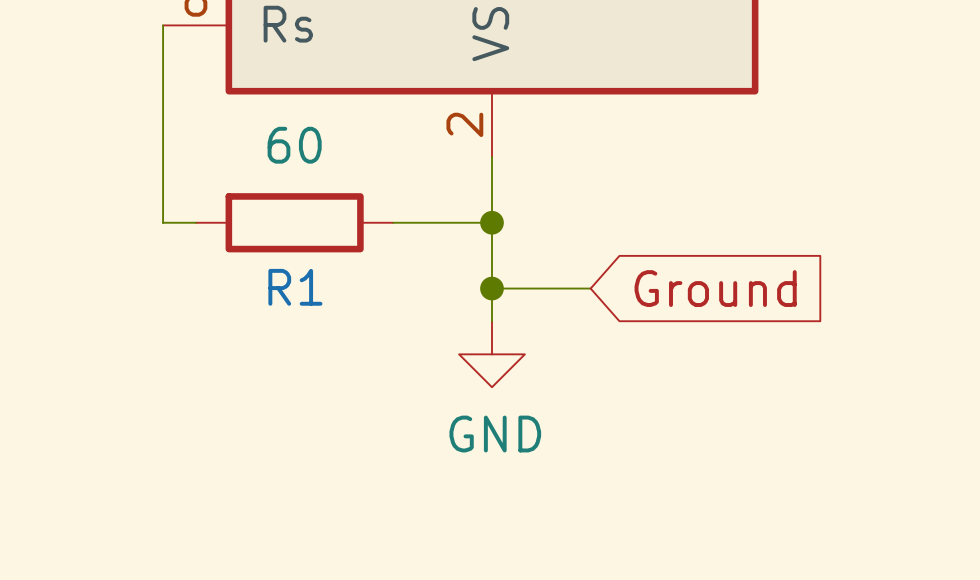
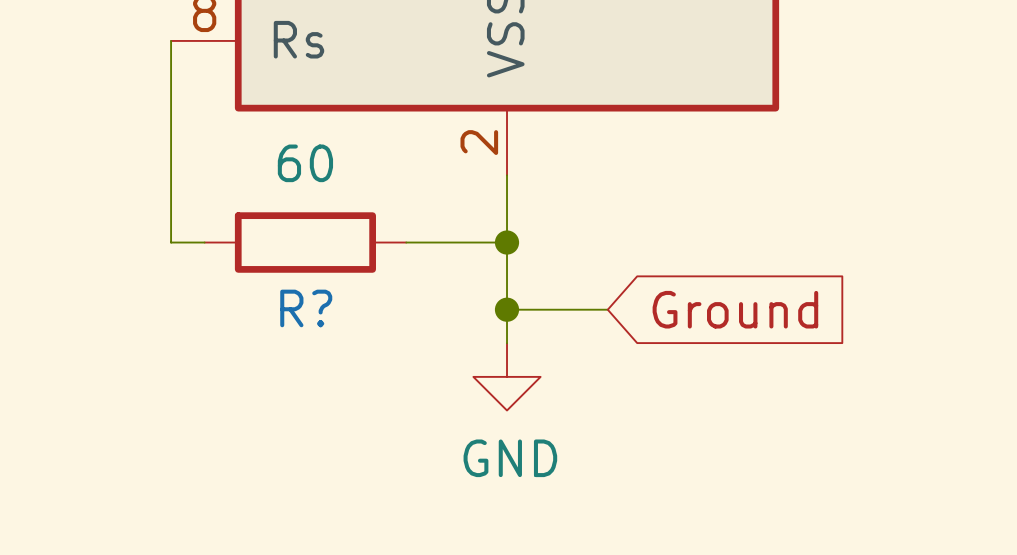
R1 name: R1 (295, 287) -> R? (306, 308)

